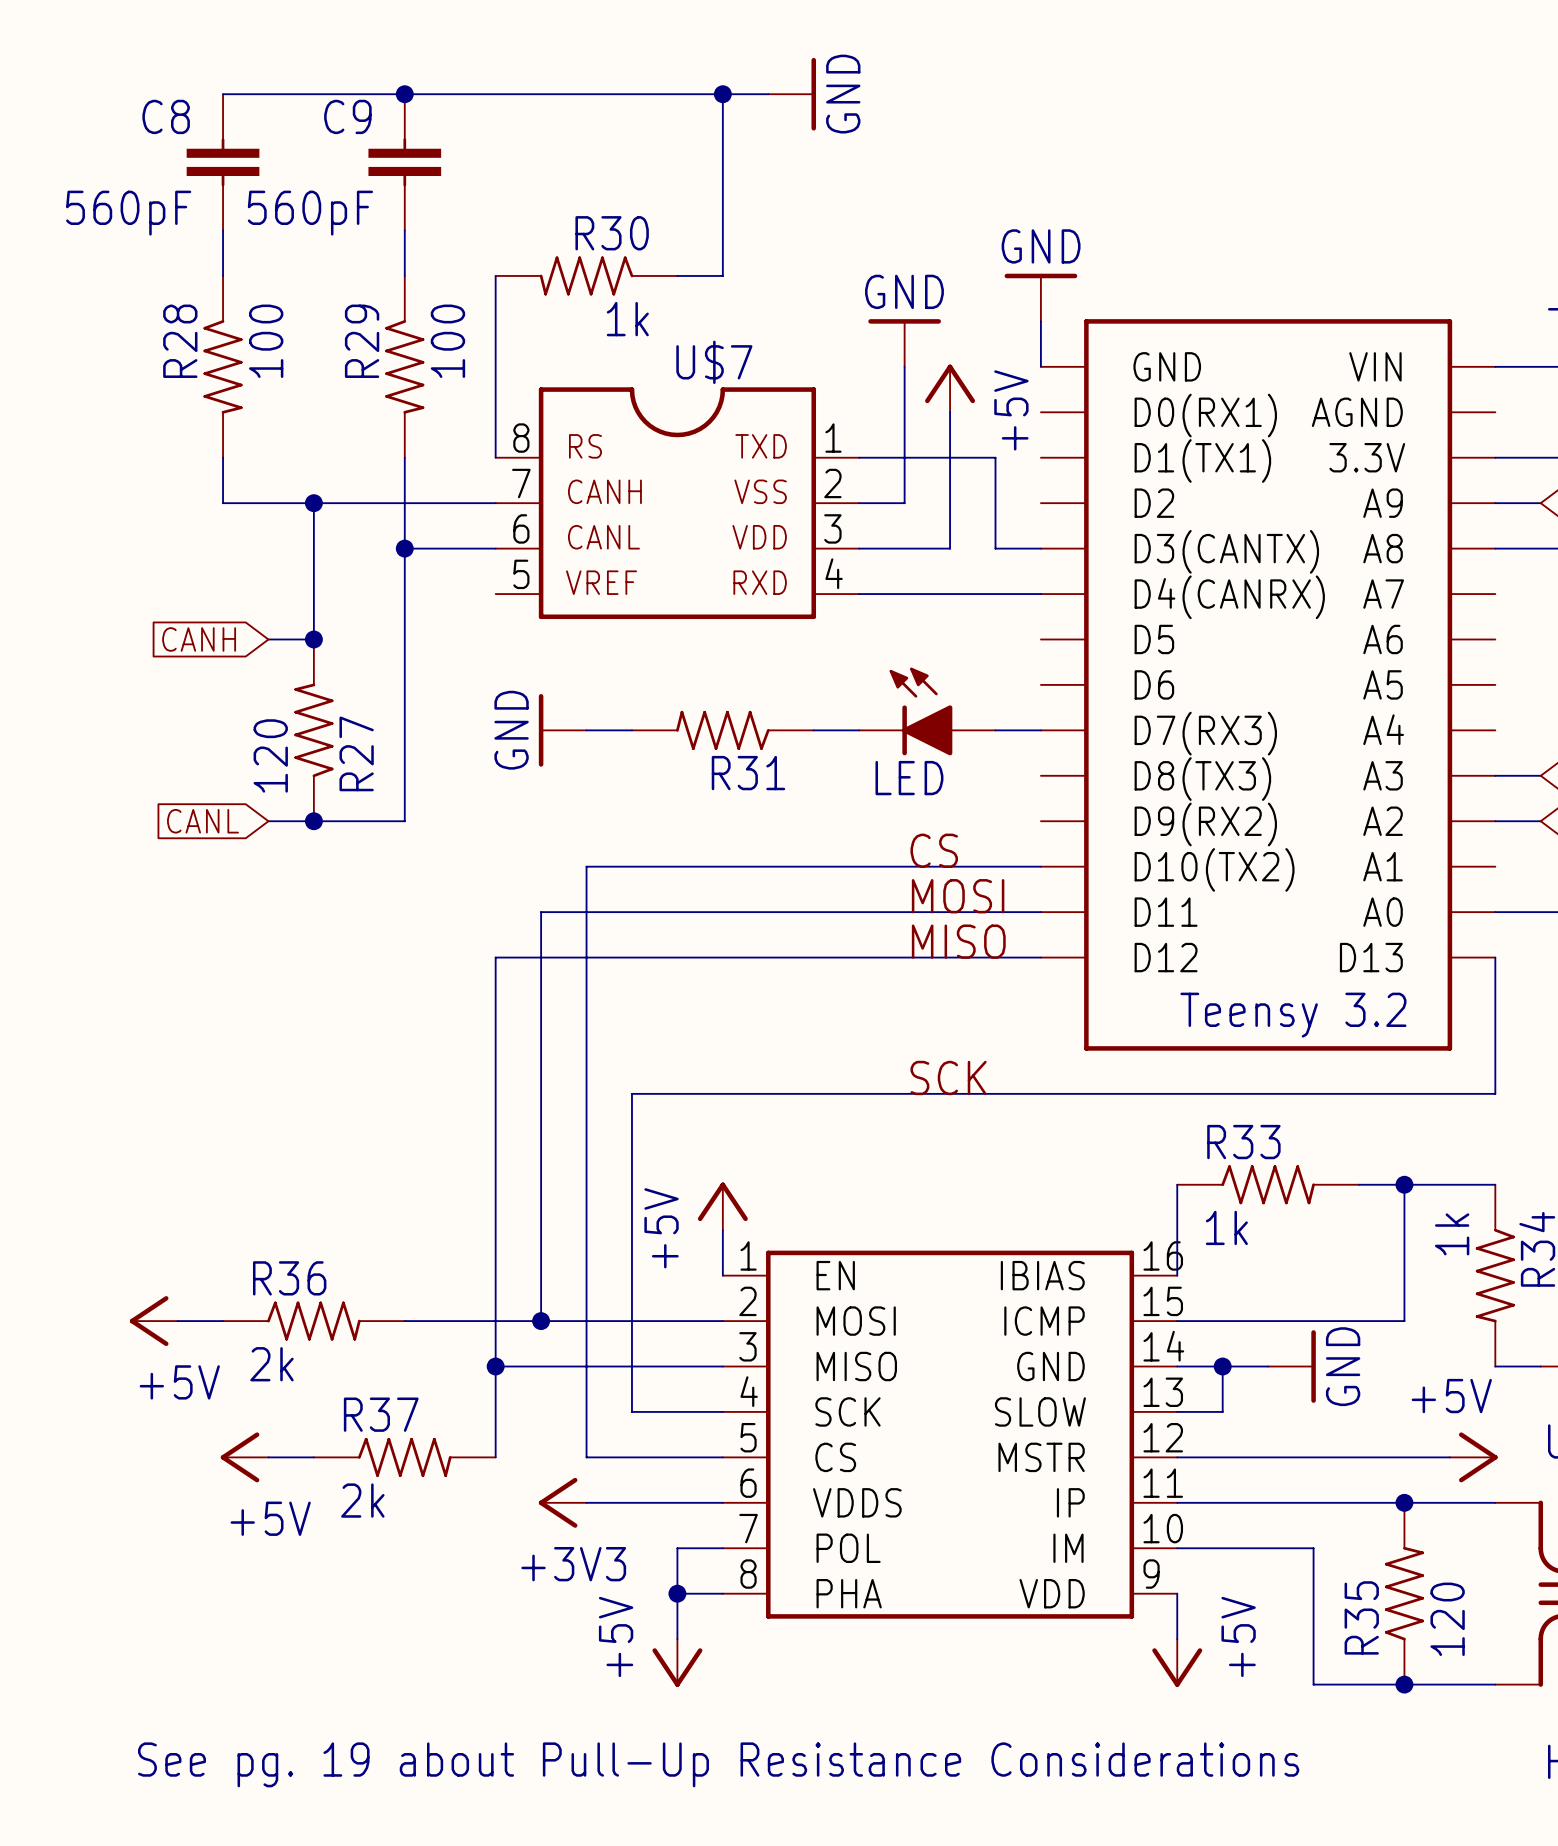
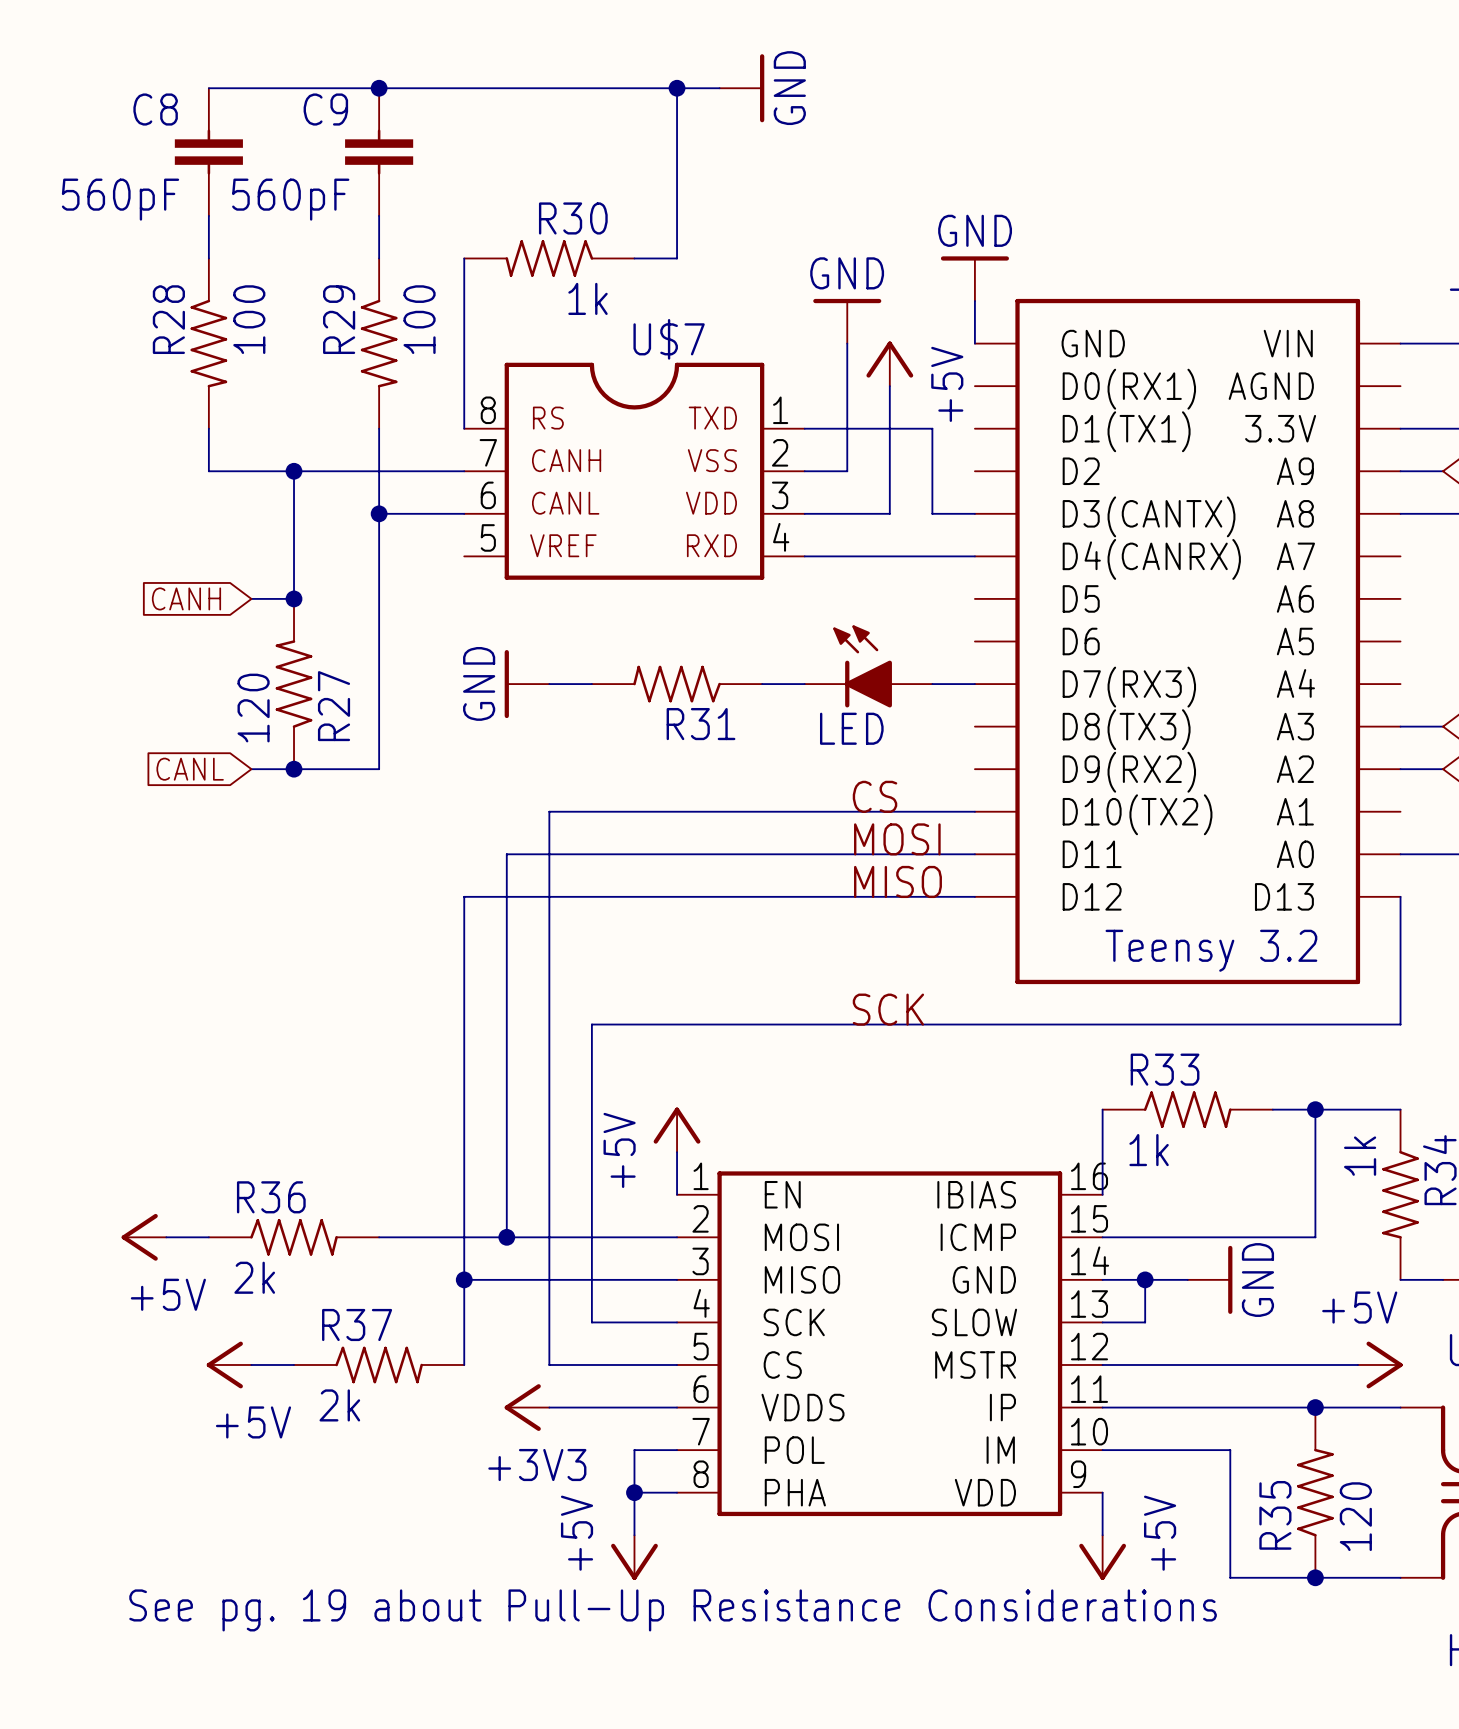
text position: See pg. 19 about Pull-Up Resistance Considerations (718, 1764) -> See pg. 19 about Pull-Up Resistance Considerations (673, 1610)

